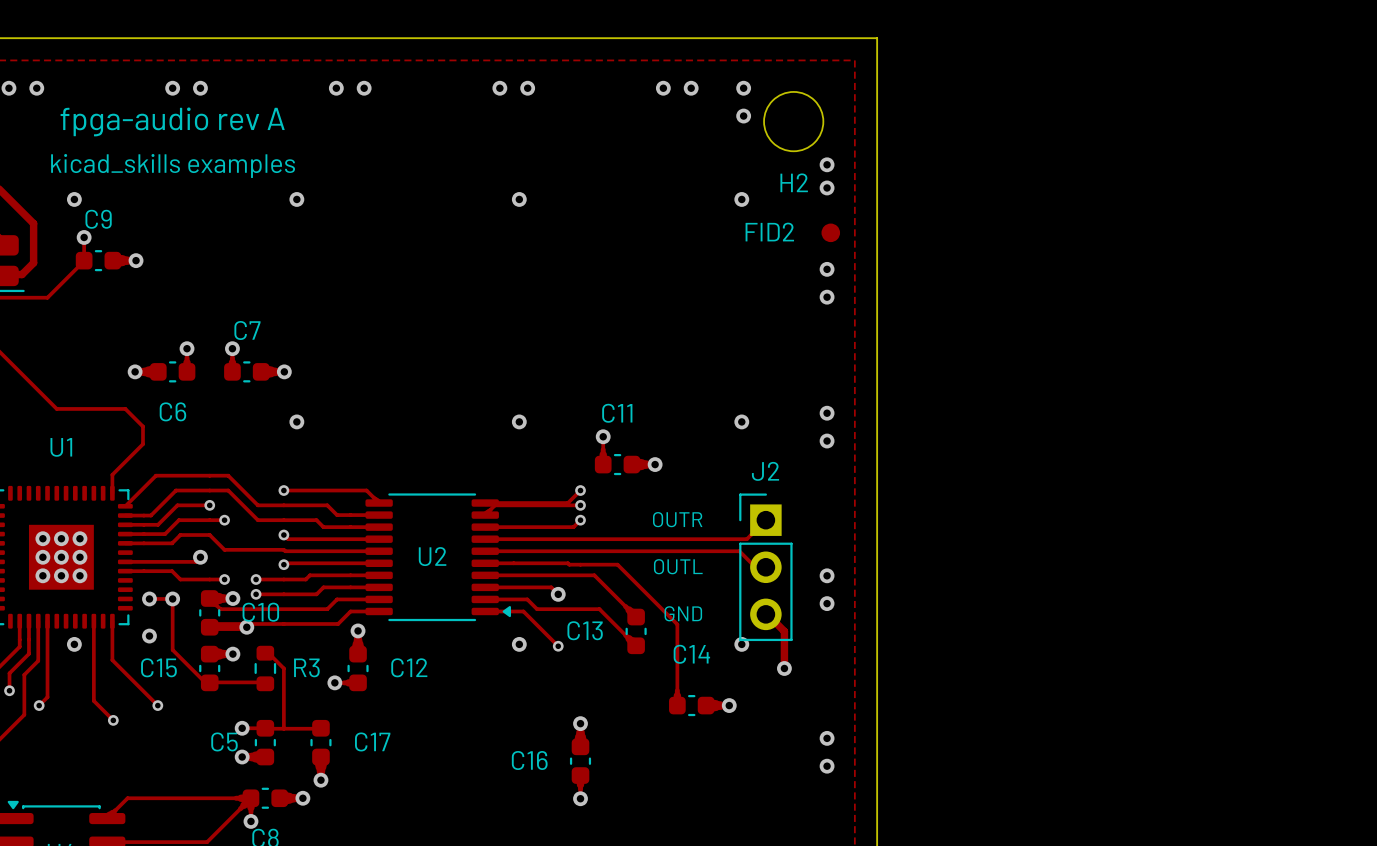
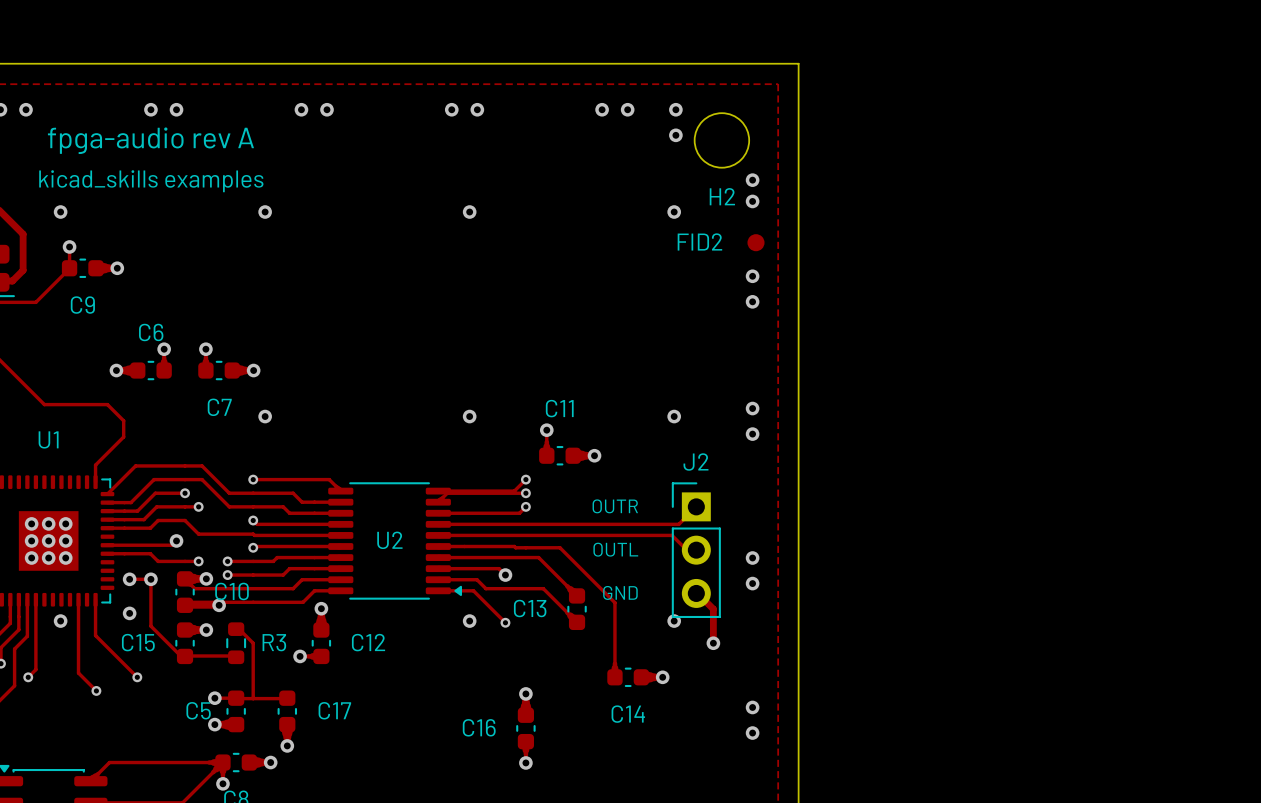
C9 name position: C9 (98, 219) -> C9 (82, 305)
C7 name position: C7 (247, 330) -> C7 (219, 407)
C6 name position: C6 (172, 411) -> C6 (151, 332)
C14 name position: C14 (691, 654) -> C14 (628, 714)

